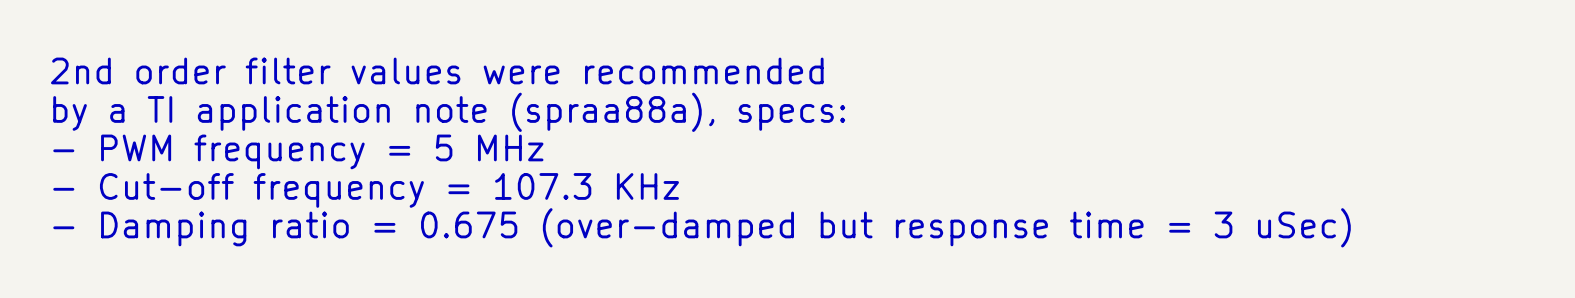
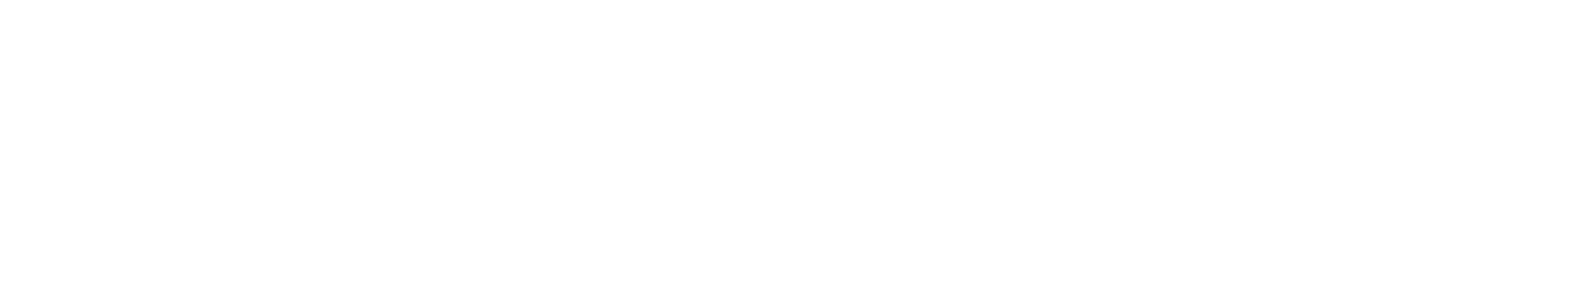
text: 2nd order filter values were recommended (437, 70) -> none
text: by a TI application note (spraa88a), specs: (449, 112) -> none
text: - PWM frequency = 5 MHz (298, 151) -> none
text: - Cut-off frequency = 107.3 KHz (366, 190) -> none
text: - Damping ratio = 0.675 (over-damped but response time = 3 uSec) (702, 227) -> none

